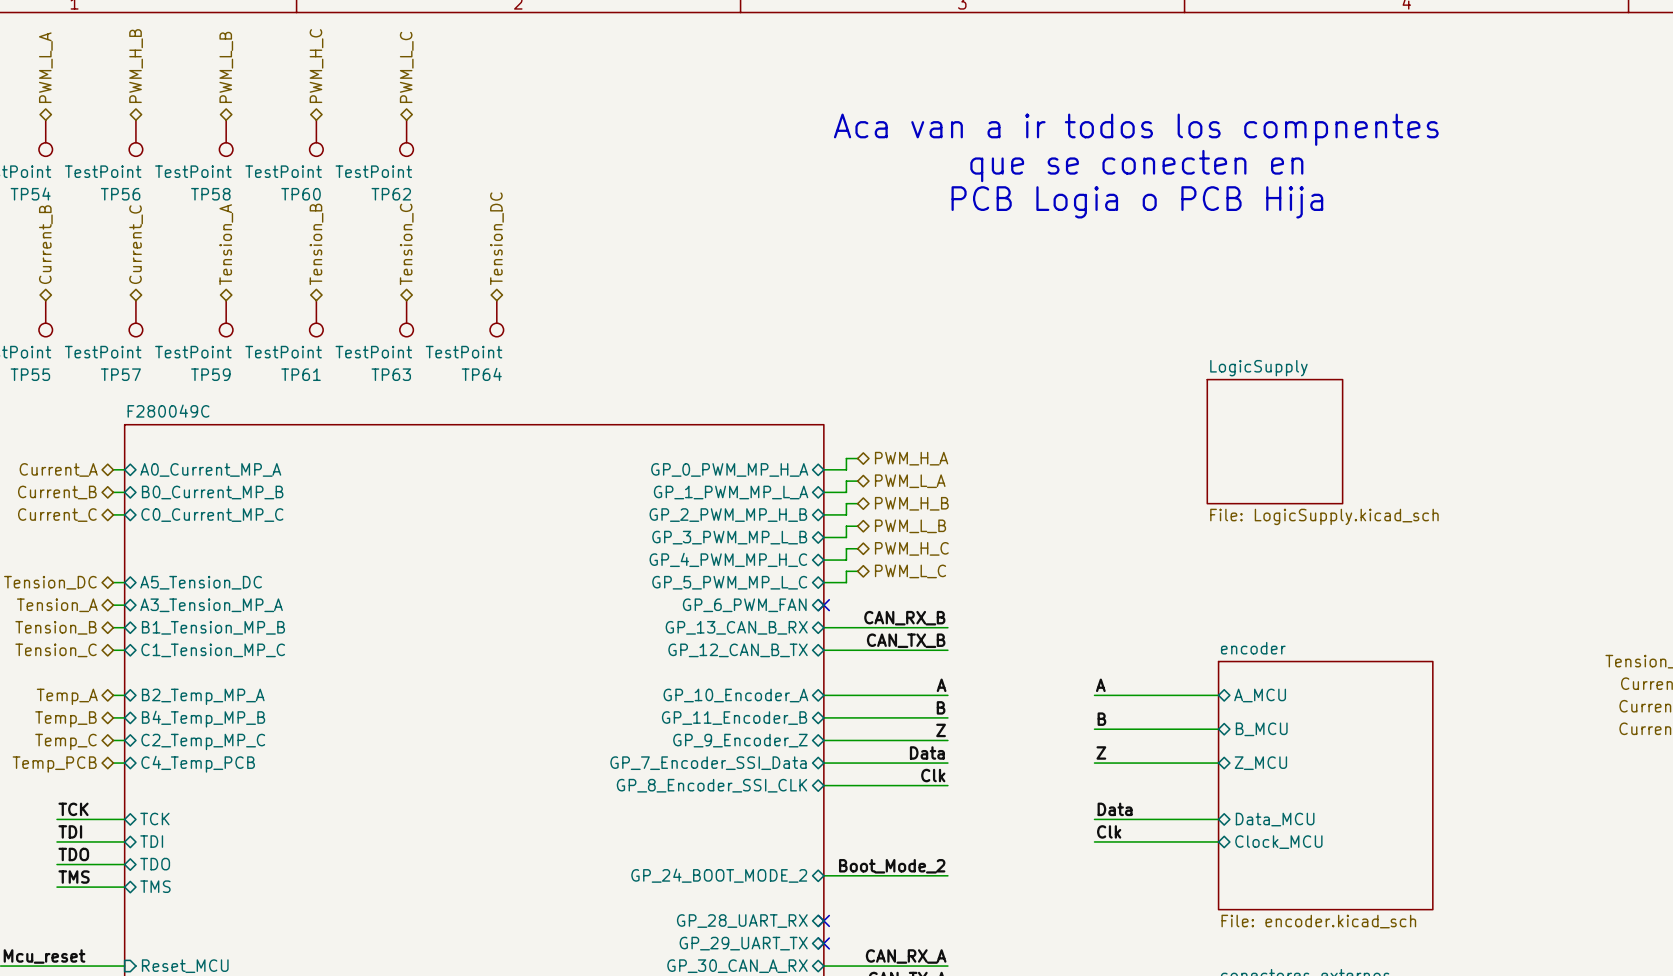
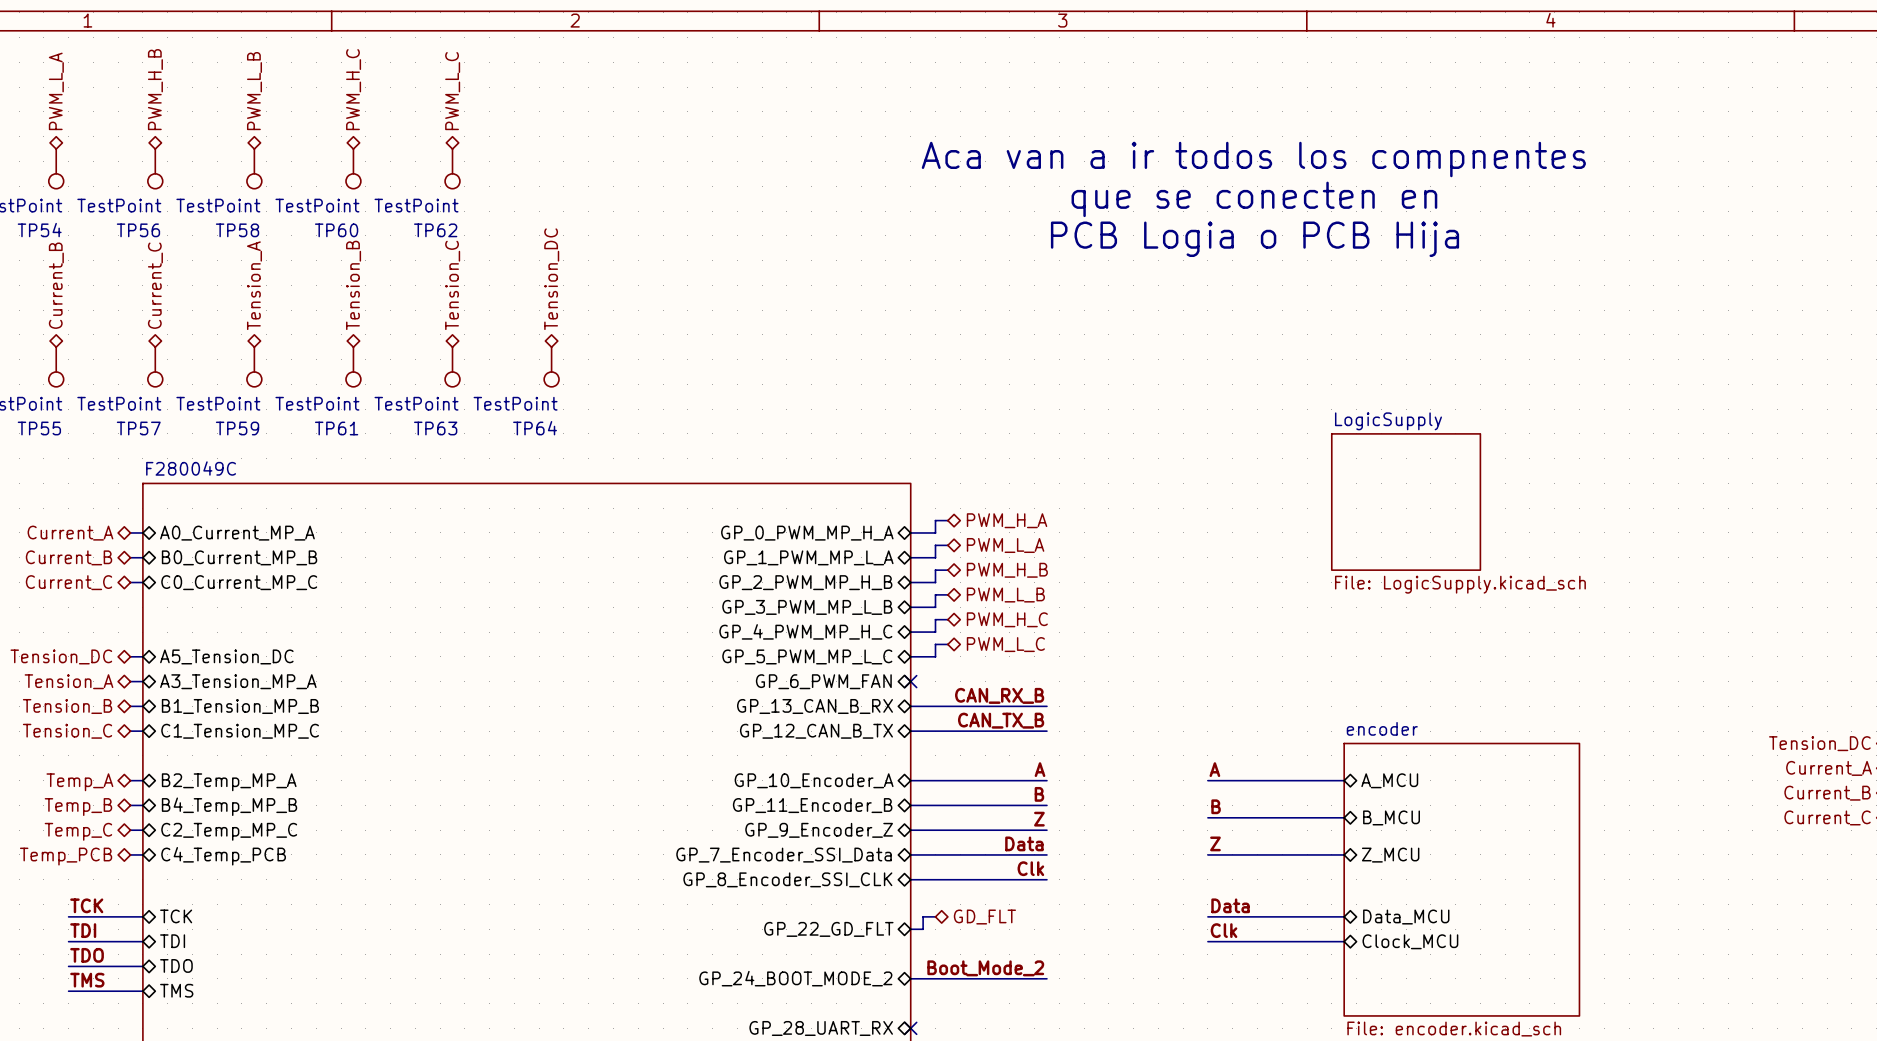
wire: none -> (935, 916) (923, 916) (923, 929) (910, 929)
hierarchical label: none -> GD_FLT (984, 917)
sheet pin: none -> GP_22_GD_FLT (828, 929)

